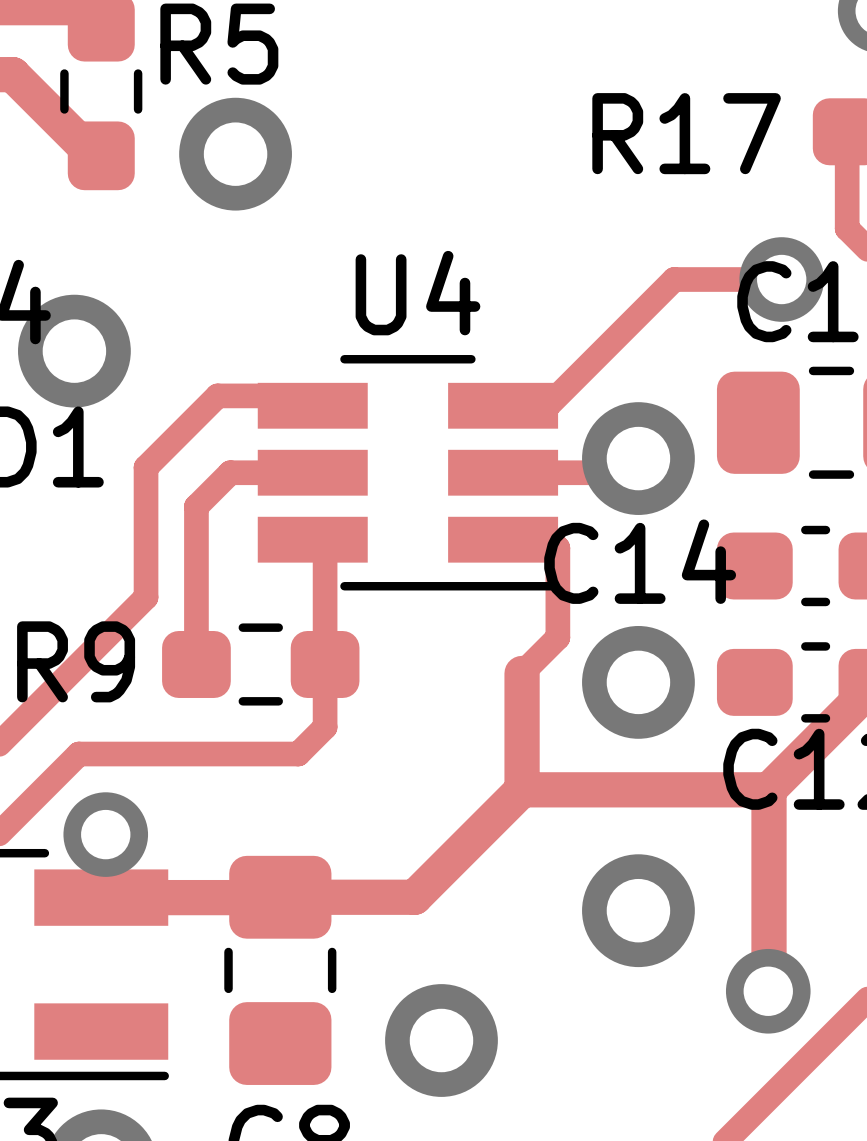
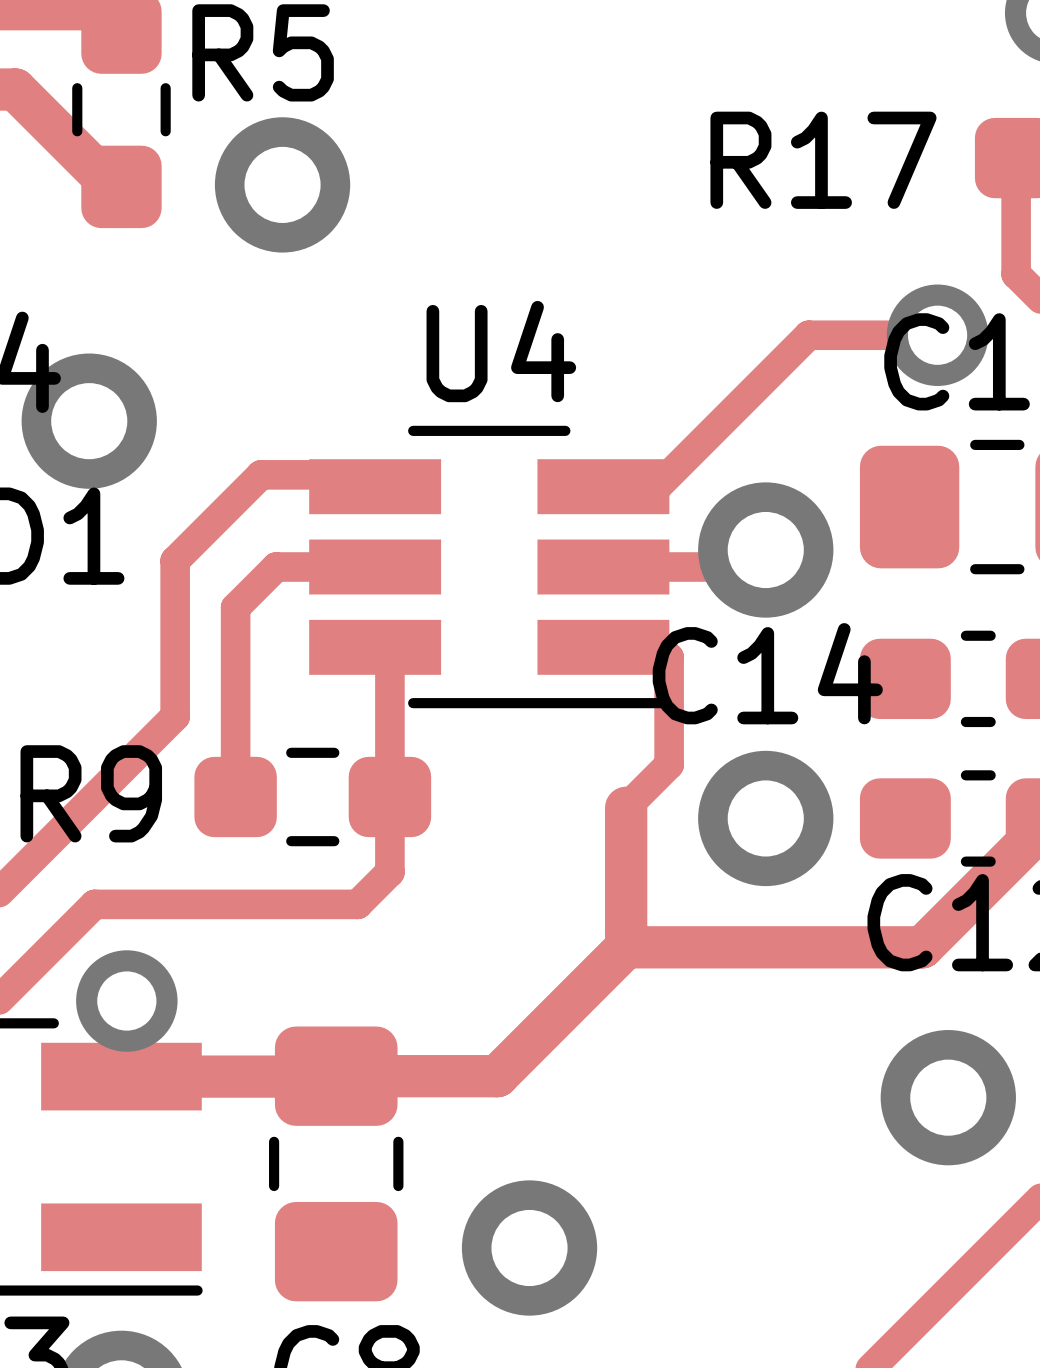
track: (769, 789) (769, 990) -> none
via: (638, 910) -> none
via: none -> (948, 1097)
via: (768, 991) -> none

